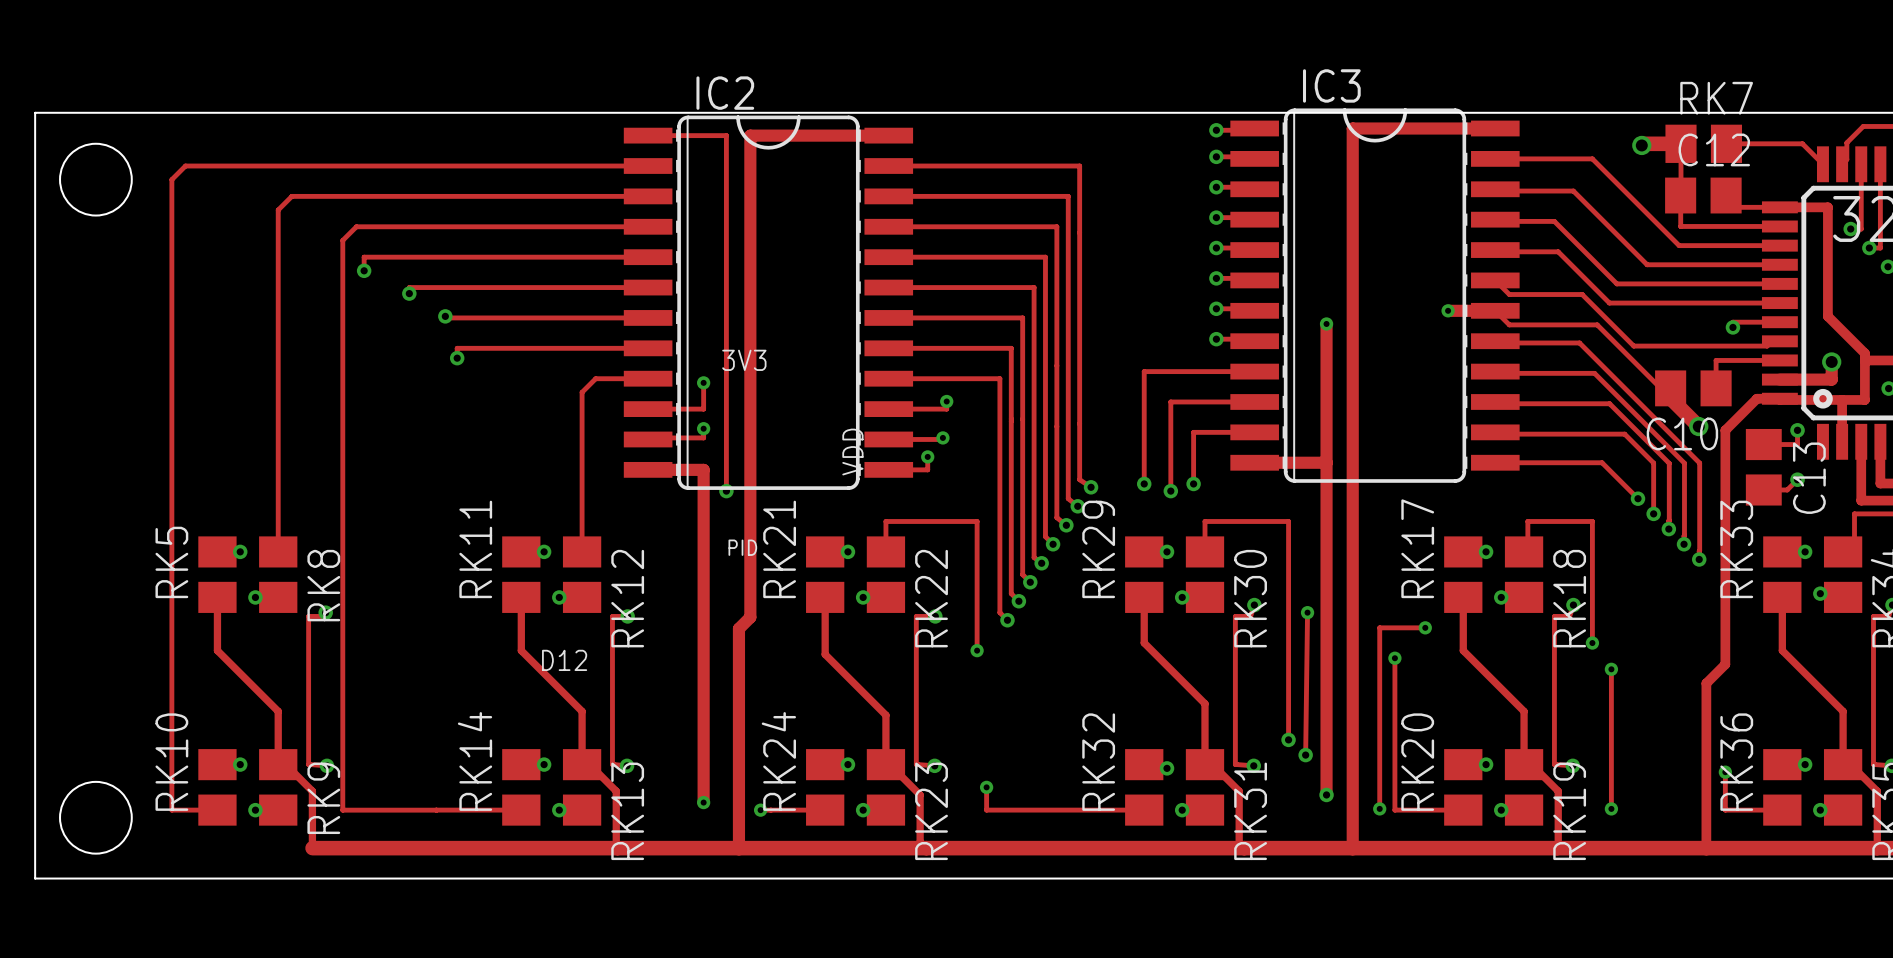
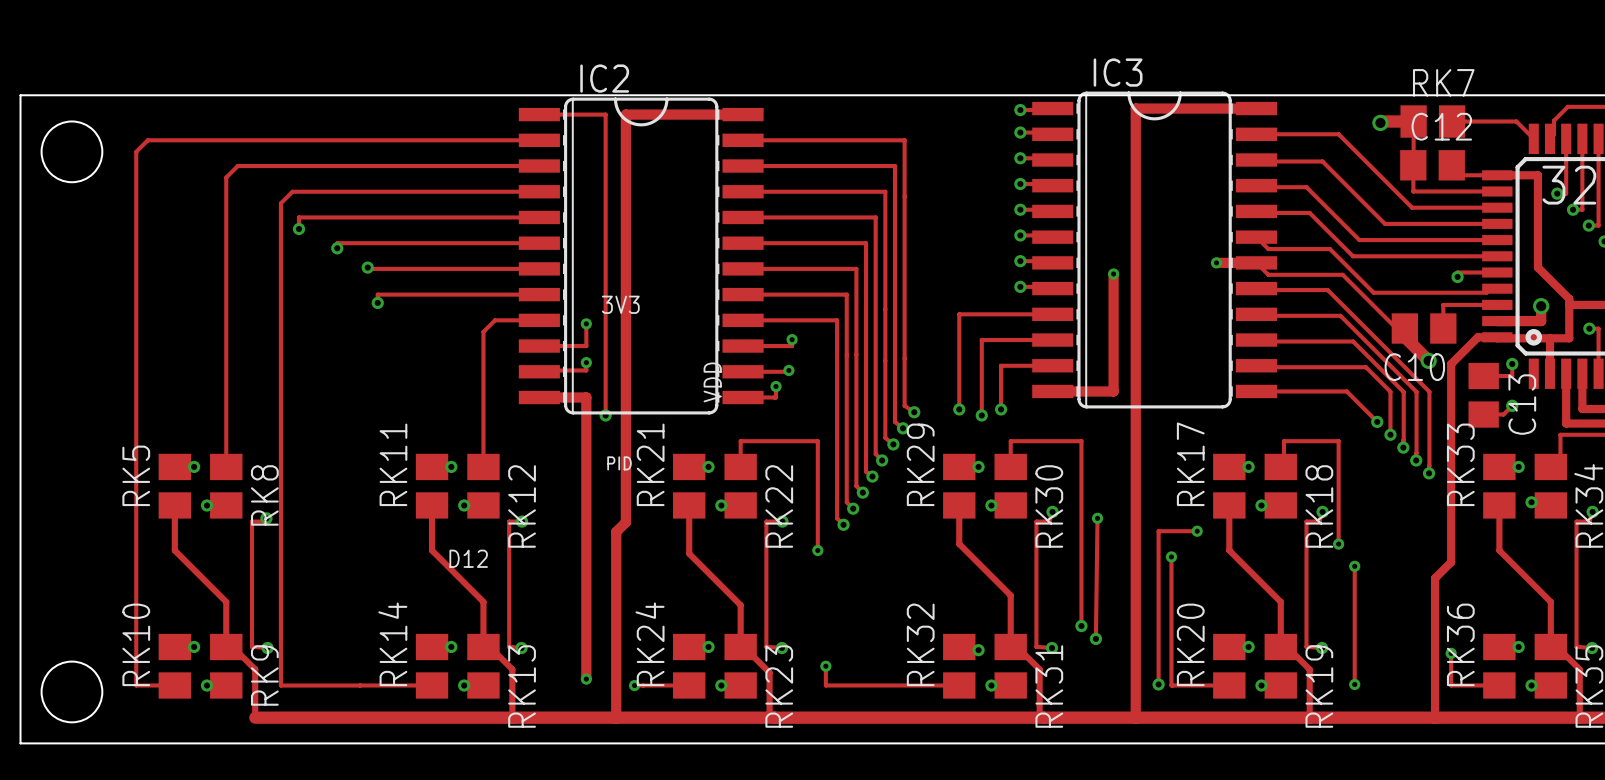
track: (1326, 462) (1326, 794) -> none
via position: (1326, 794) -> (1158, 684)
via: (1379, 808) -> none

